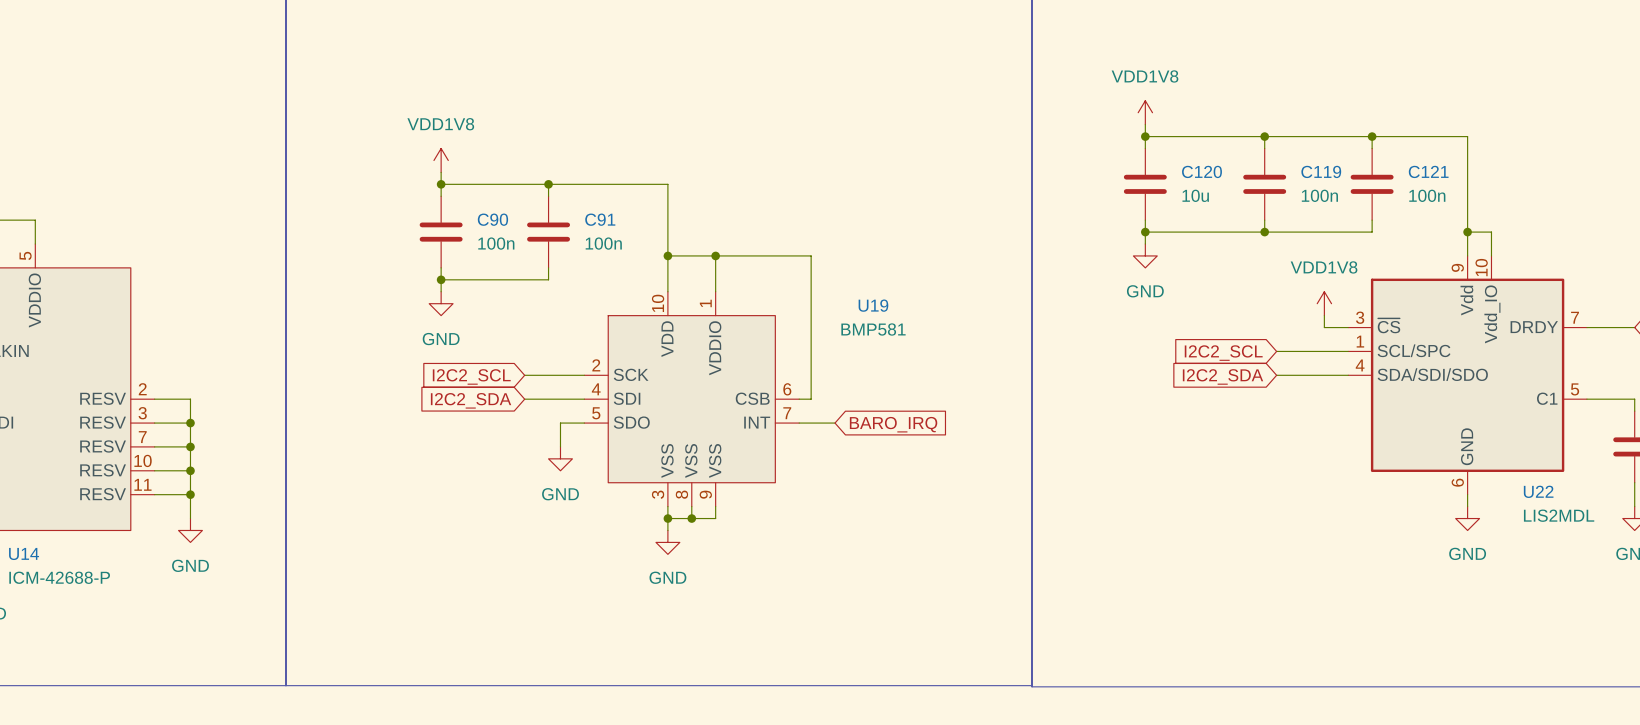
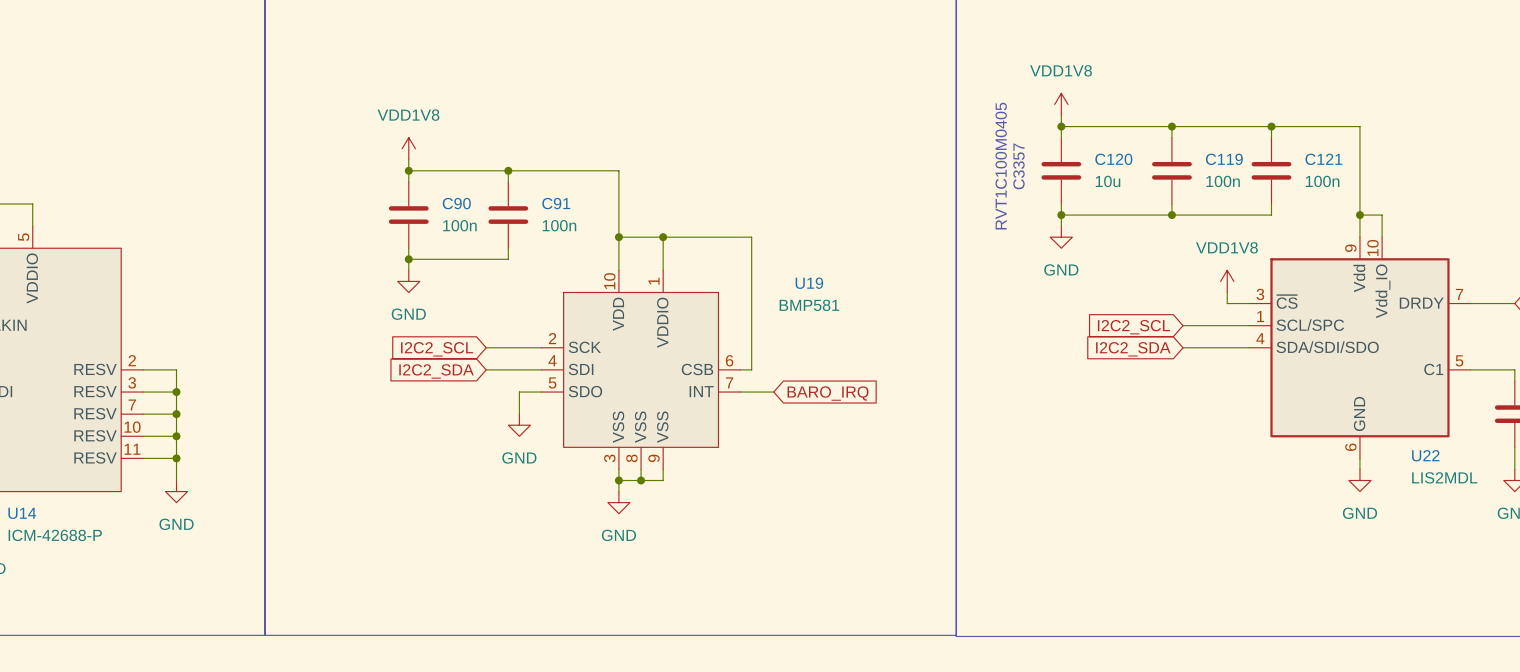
text: none -> RVT1C100M0405 (1001, 166)
text: none -> C3357 (1018, 166)

